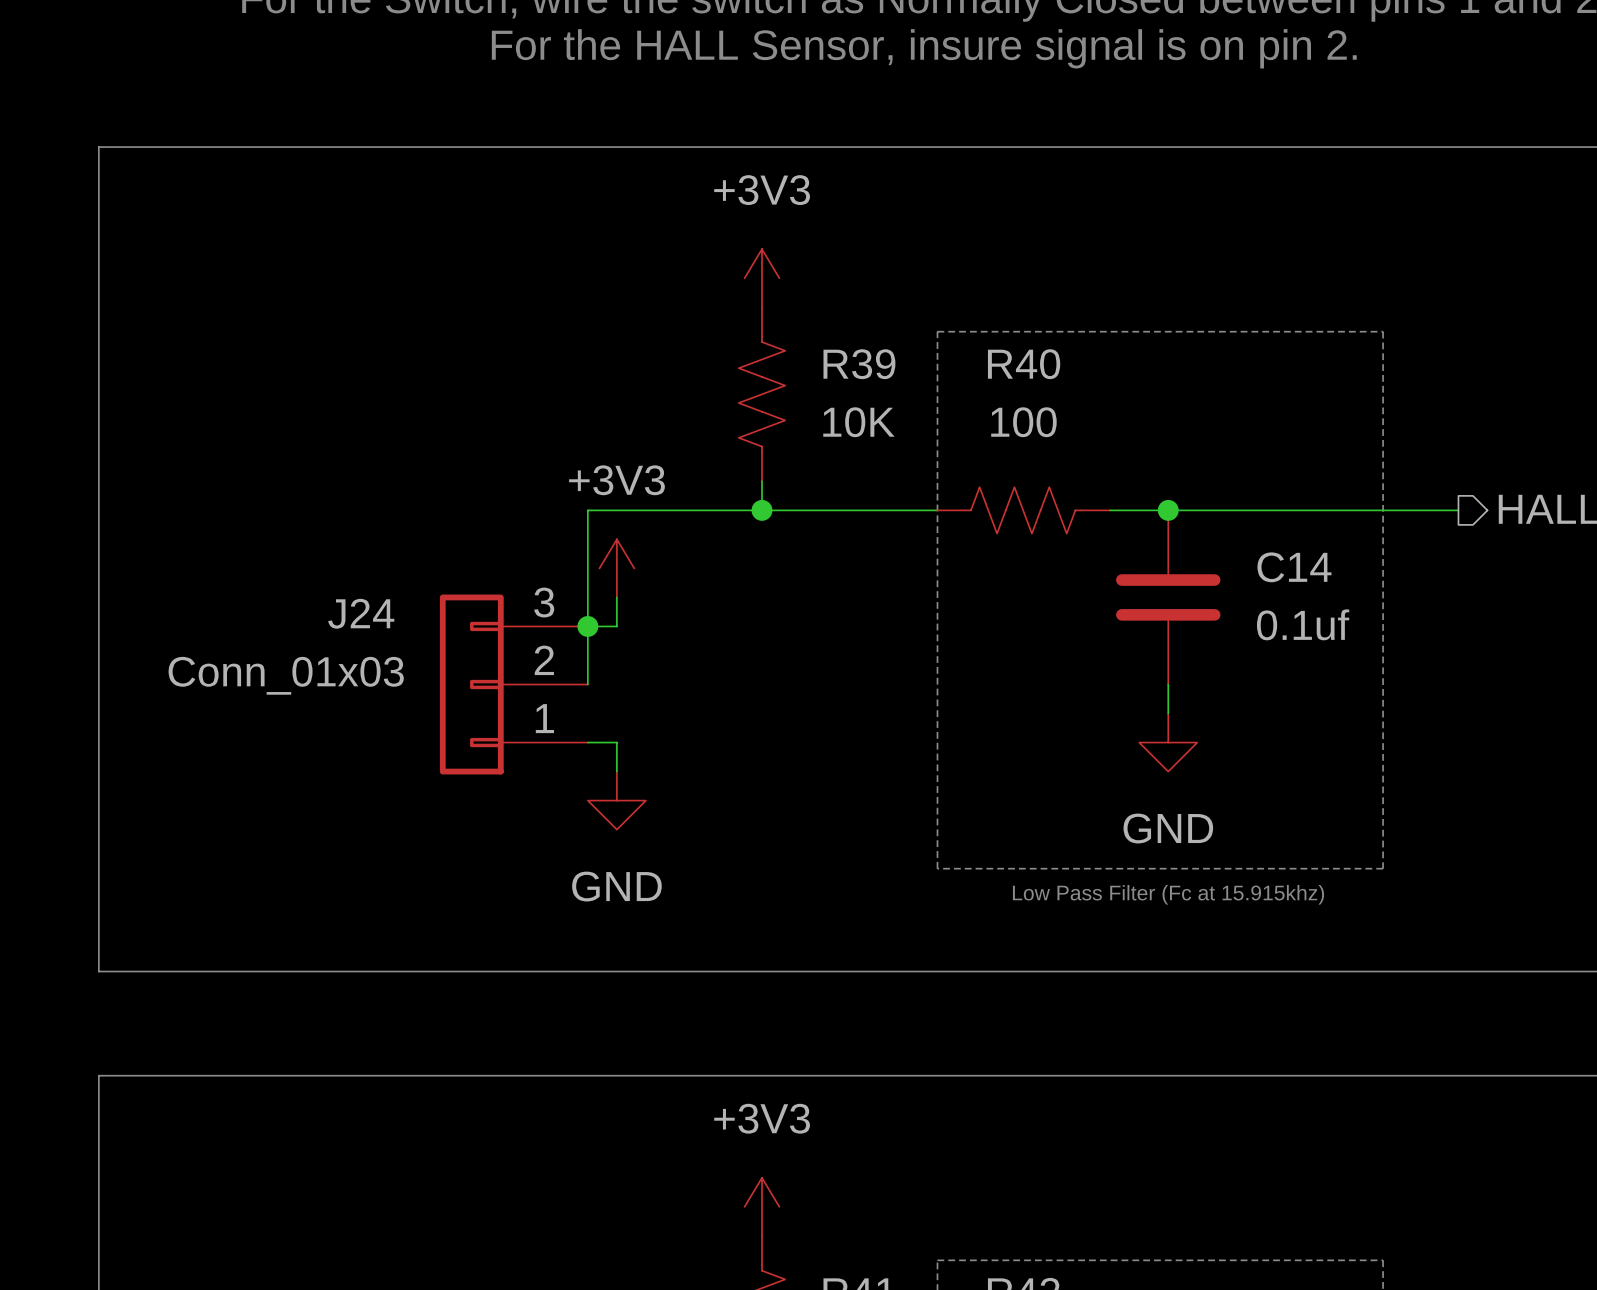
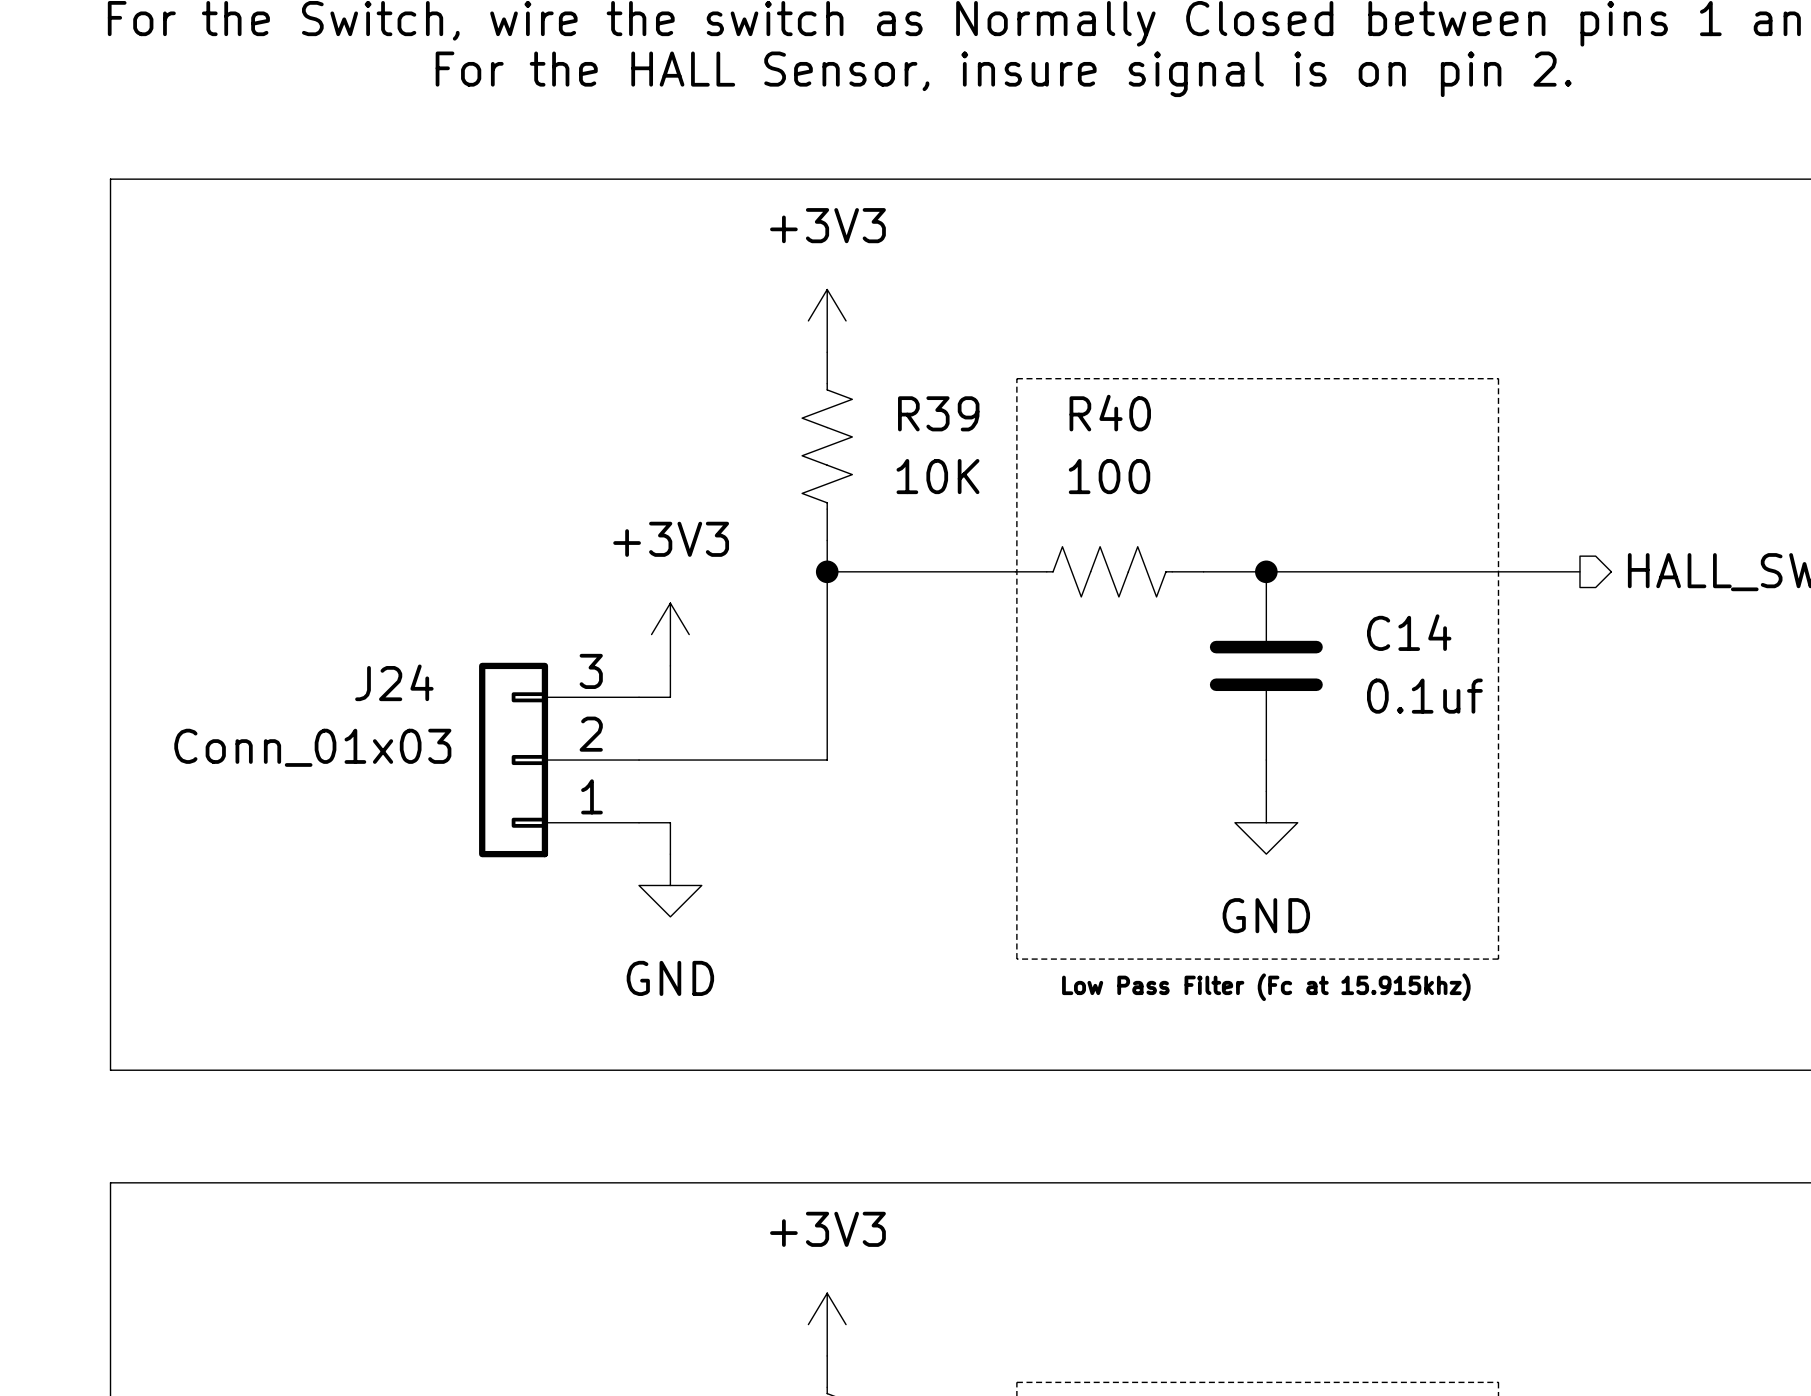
wire: (761, 510) (587, 510) (587, 684) -> (827, 571) (827, 760) (639, 760)
junction: (587, 626) -> none

